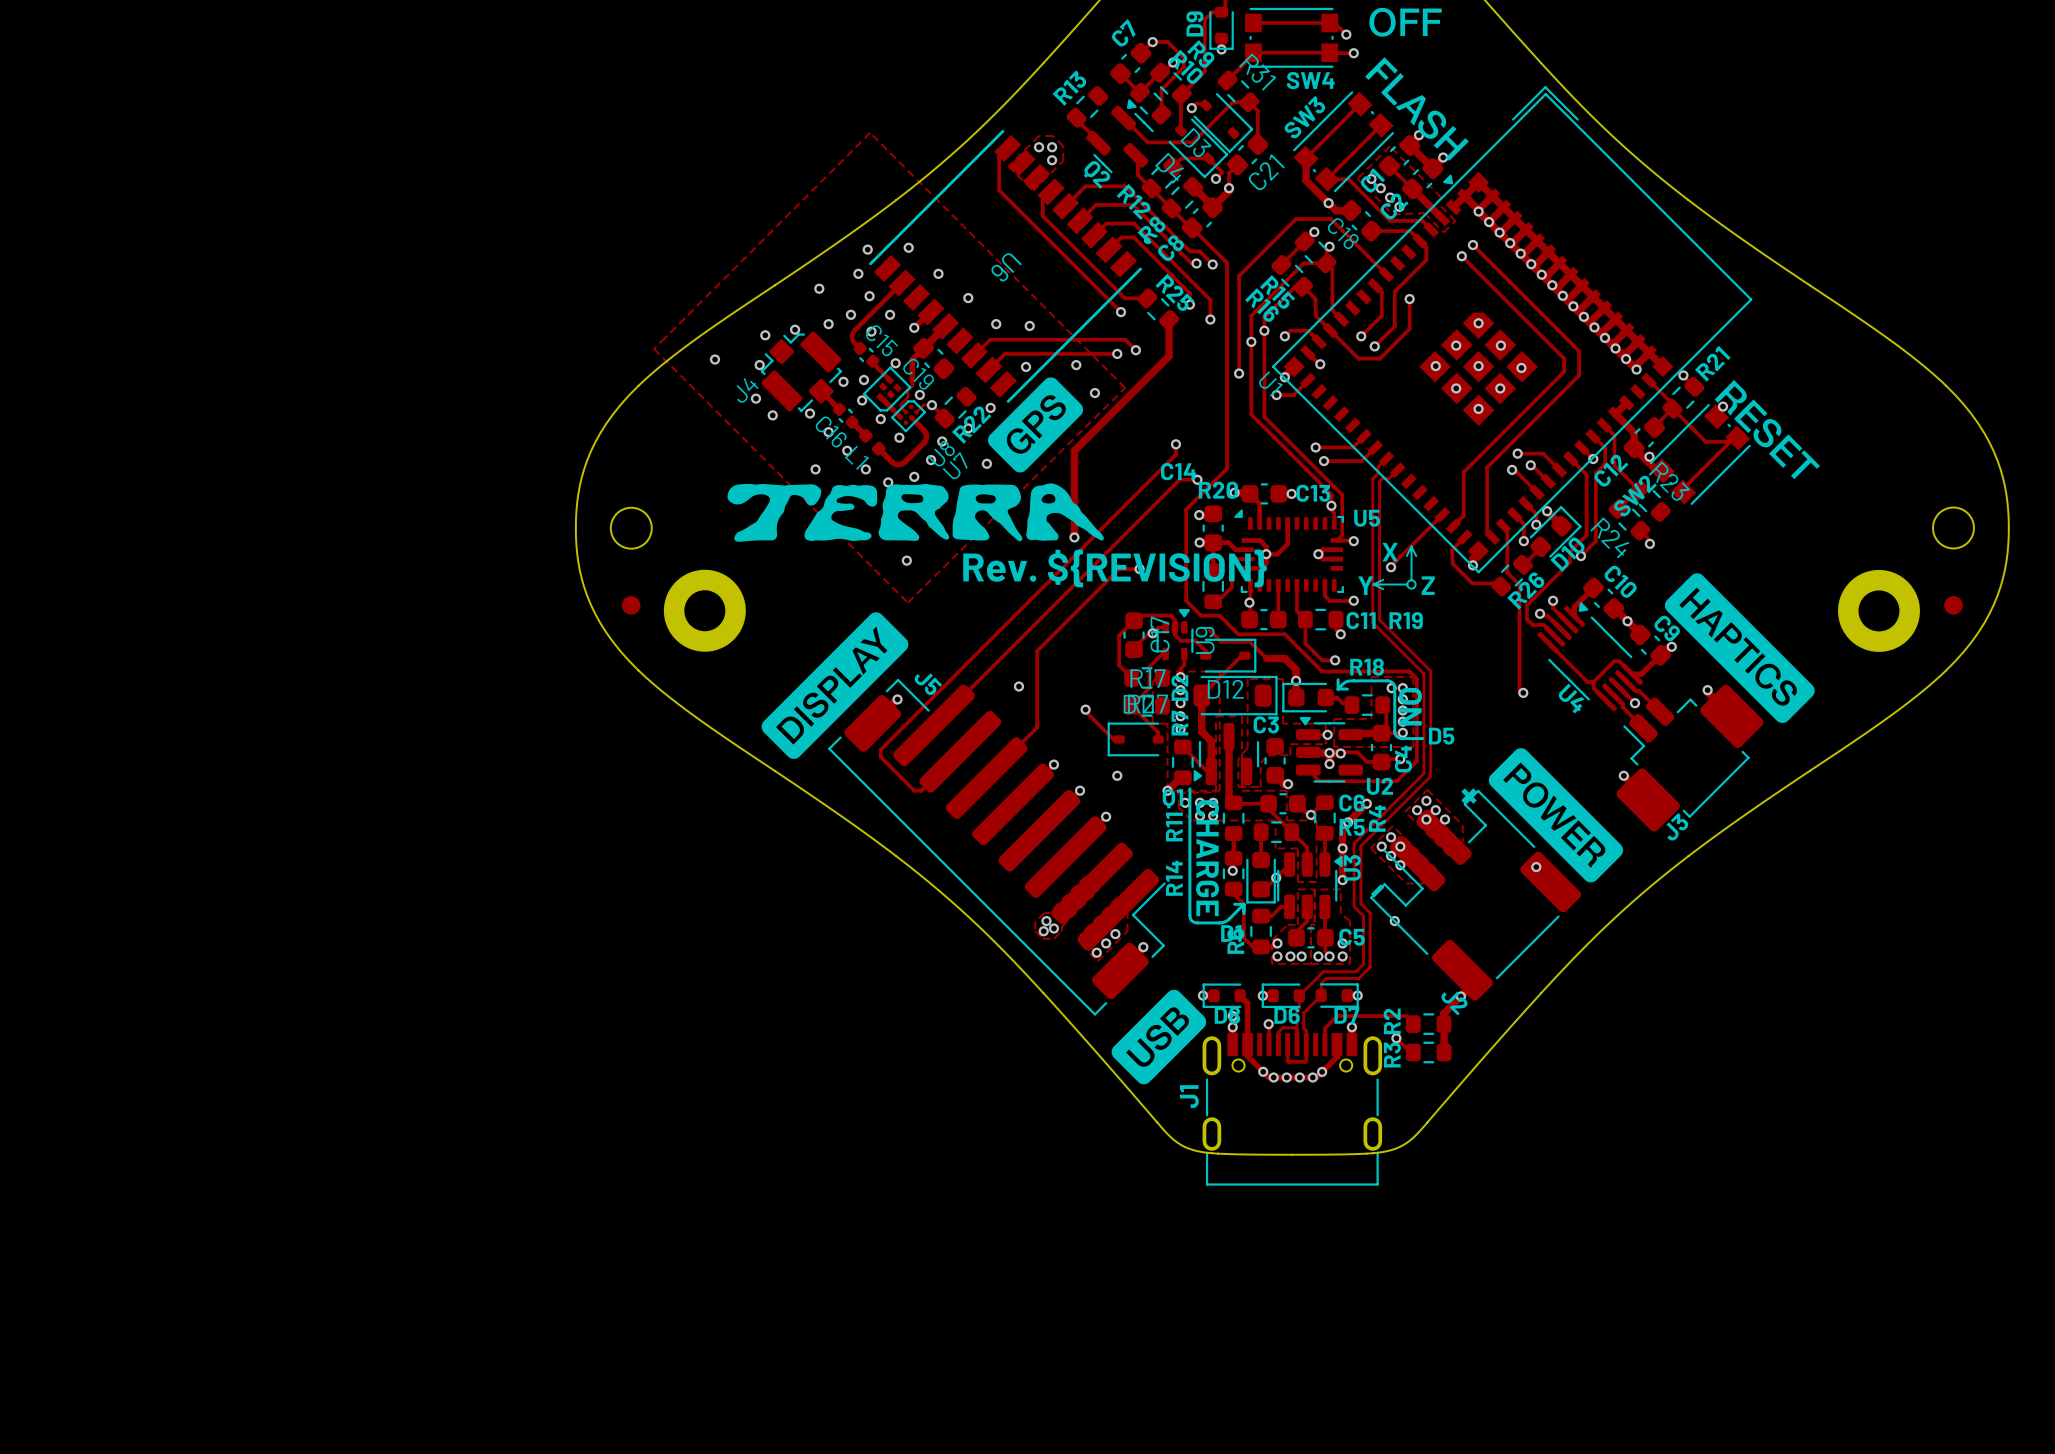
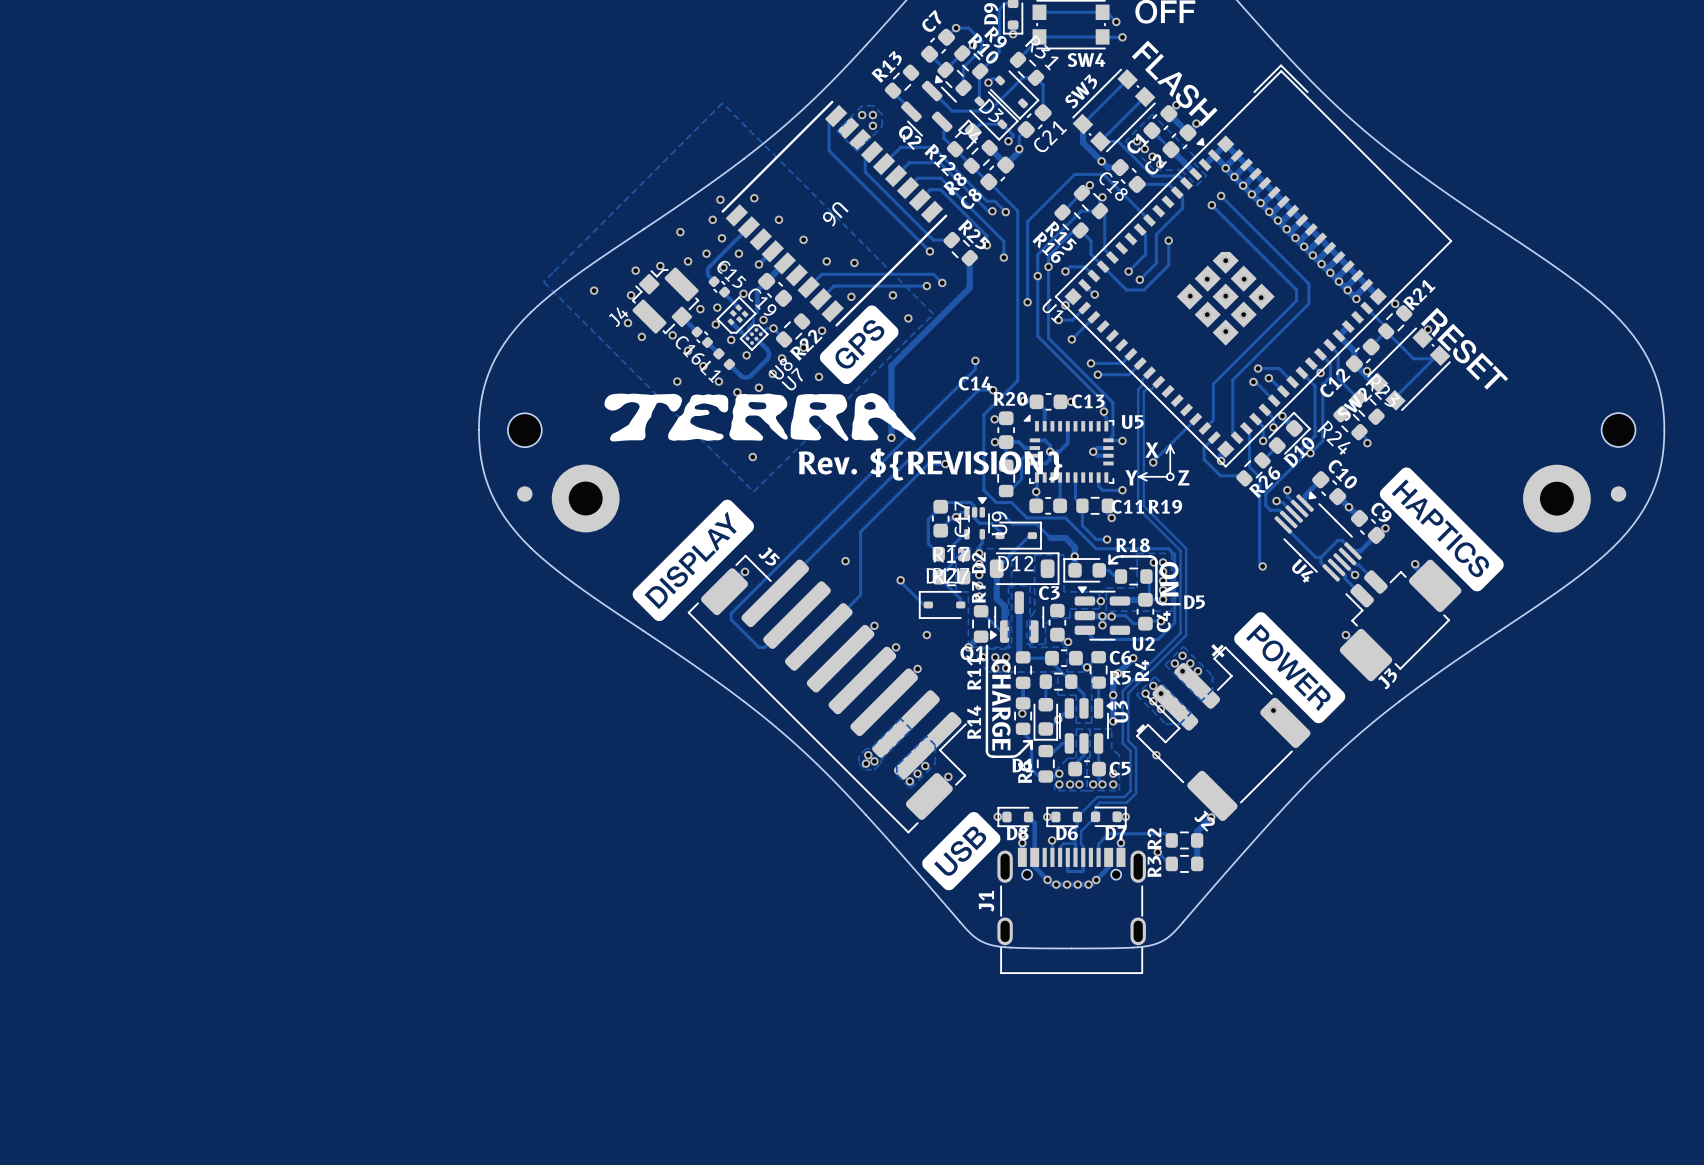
track: none -> (1093, 317) (1071, 339)
via: none -> (1071, 339)

